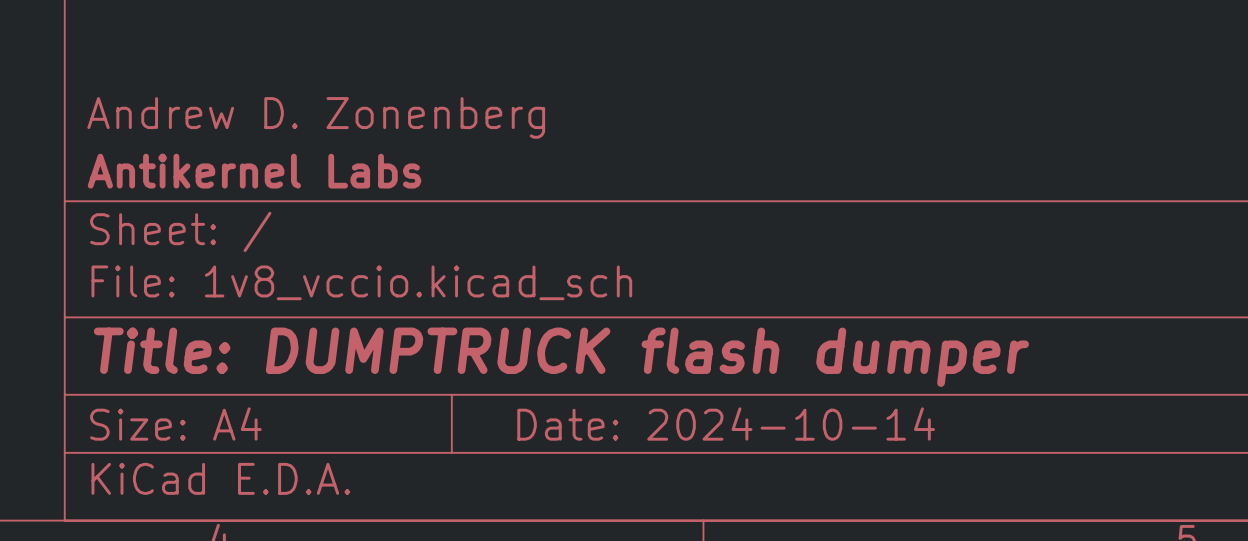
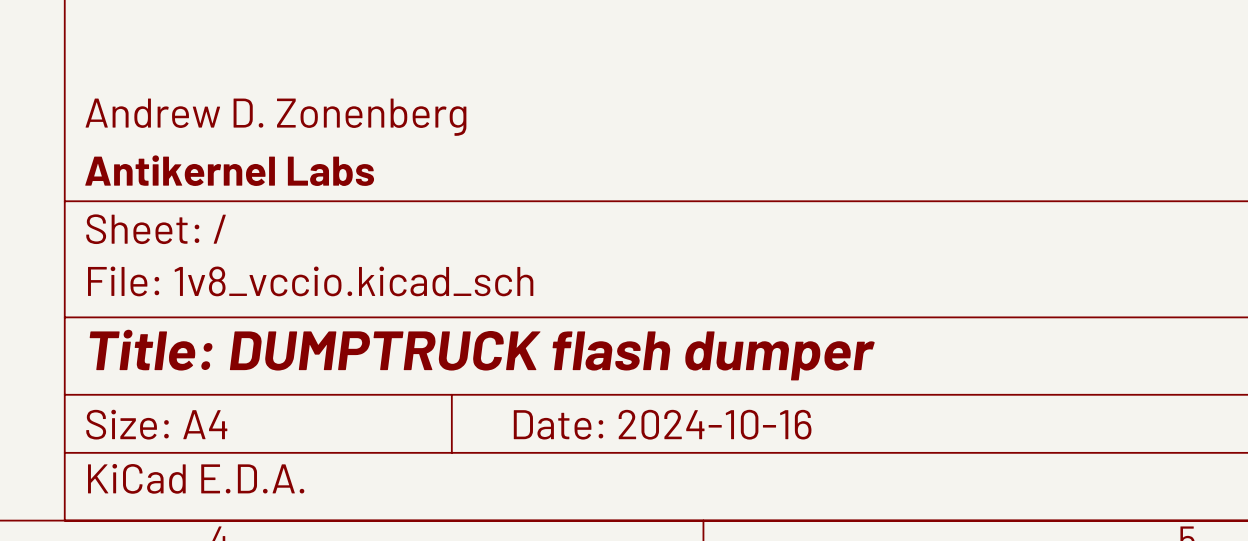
title block: Date: 2024-10-14 (726, 423) -> Date: 2024-10-16 (662, 424)

